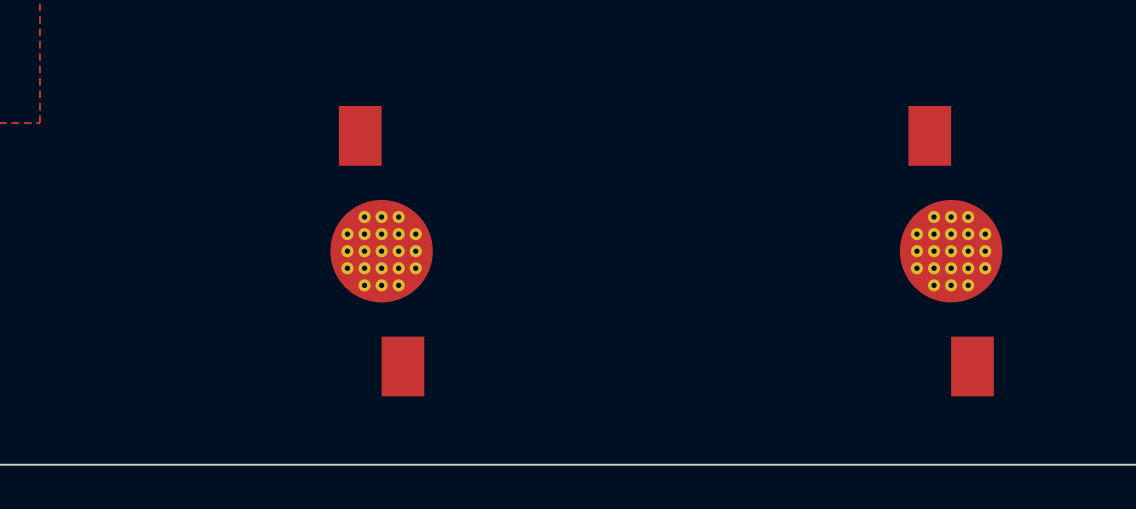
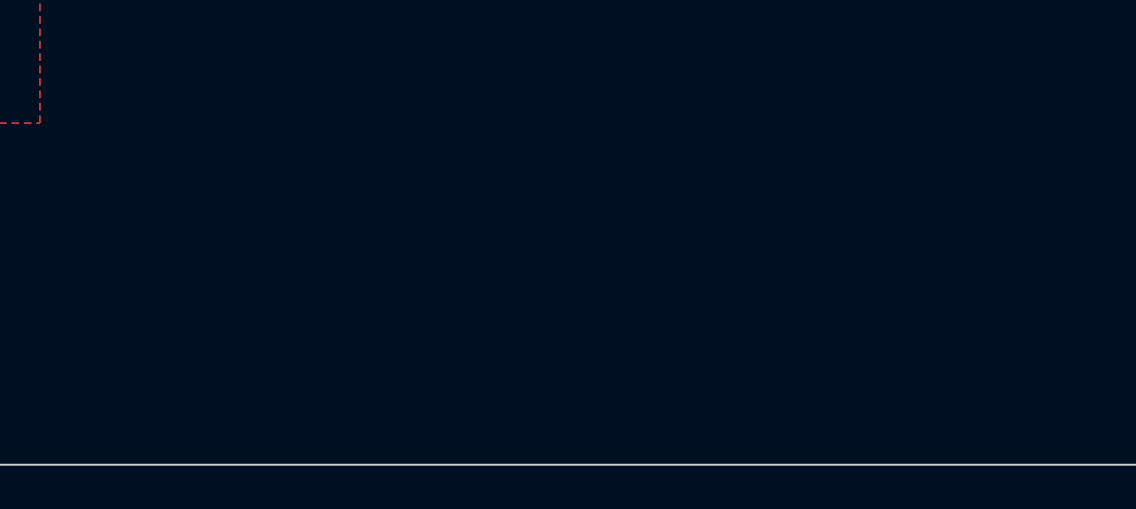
part: (381, 251) -> none
part: (951, 251) -> none

